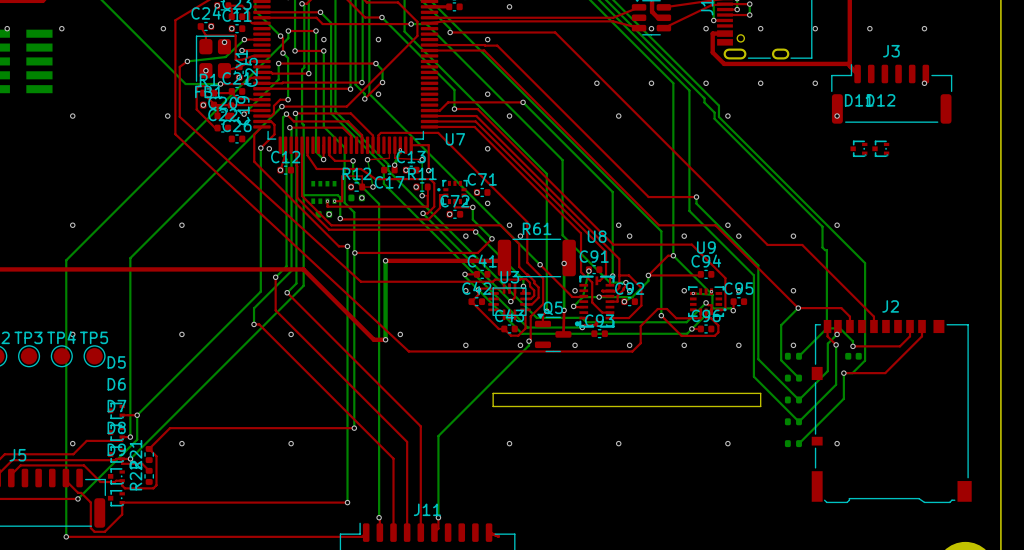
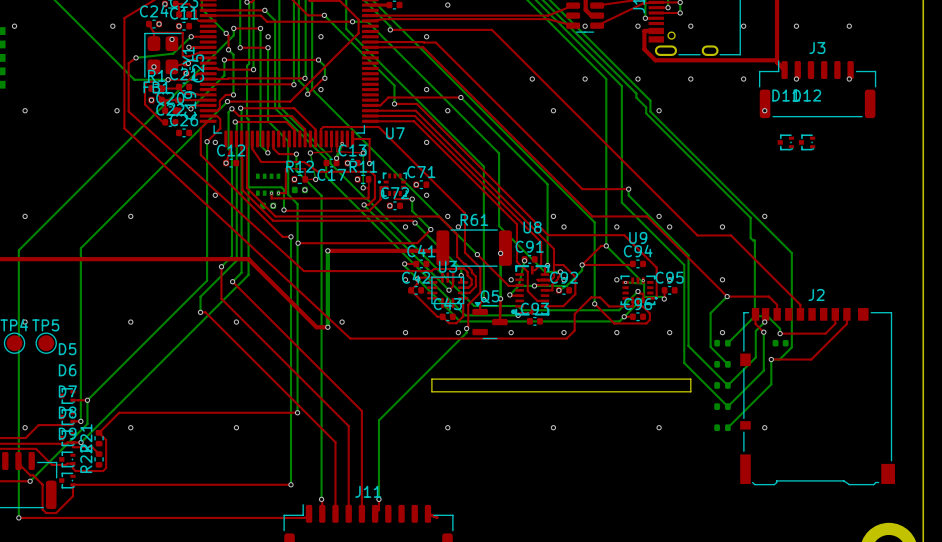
via: none -> (188, 63)
via: none -> (796, 79)
via: none -> (215, 195)

